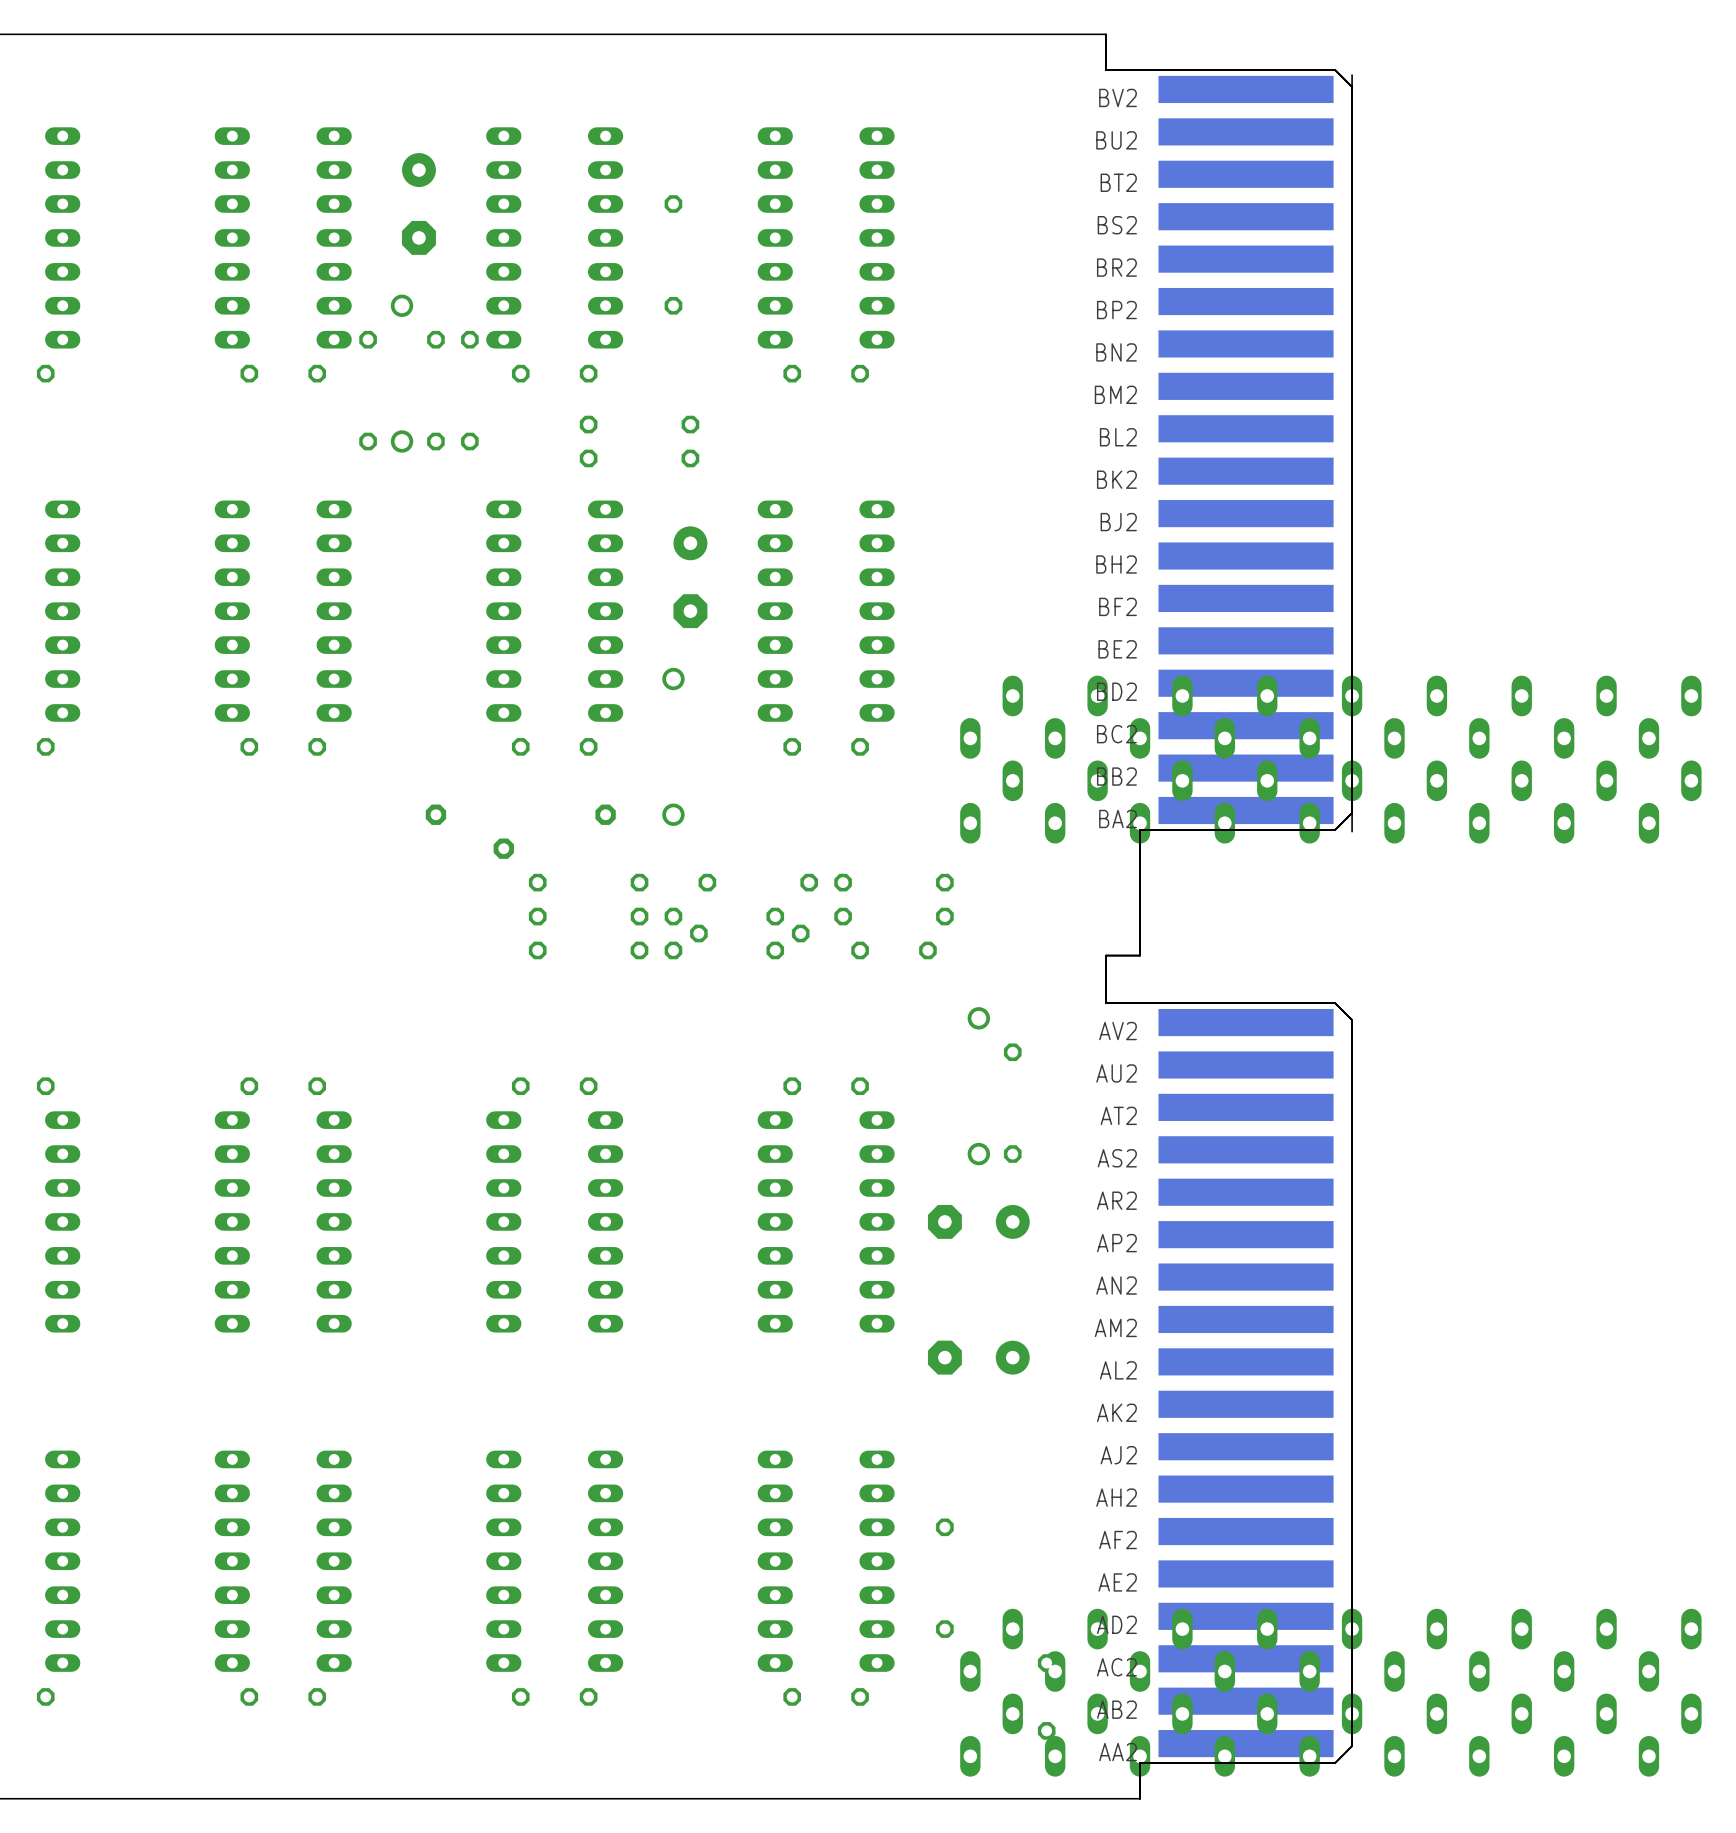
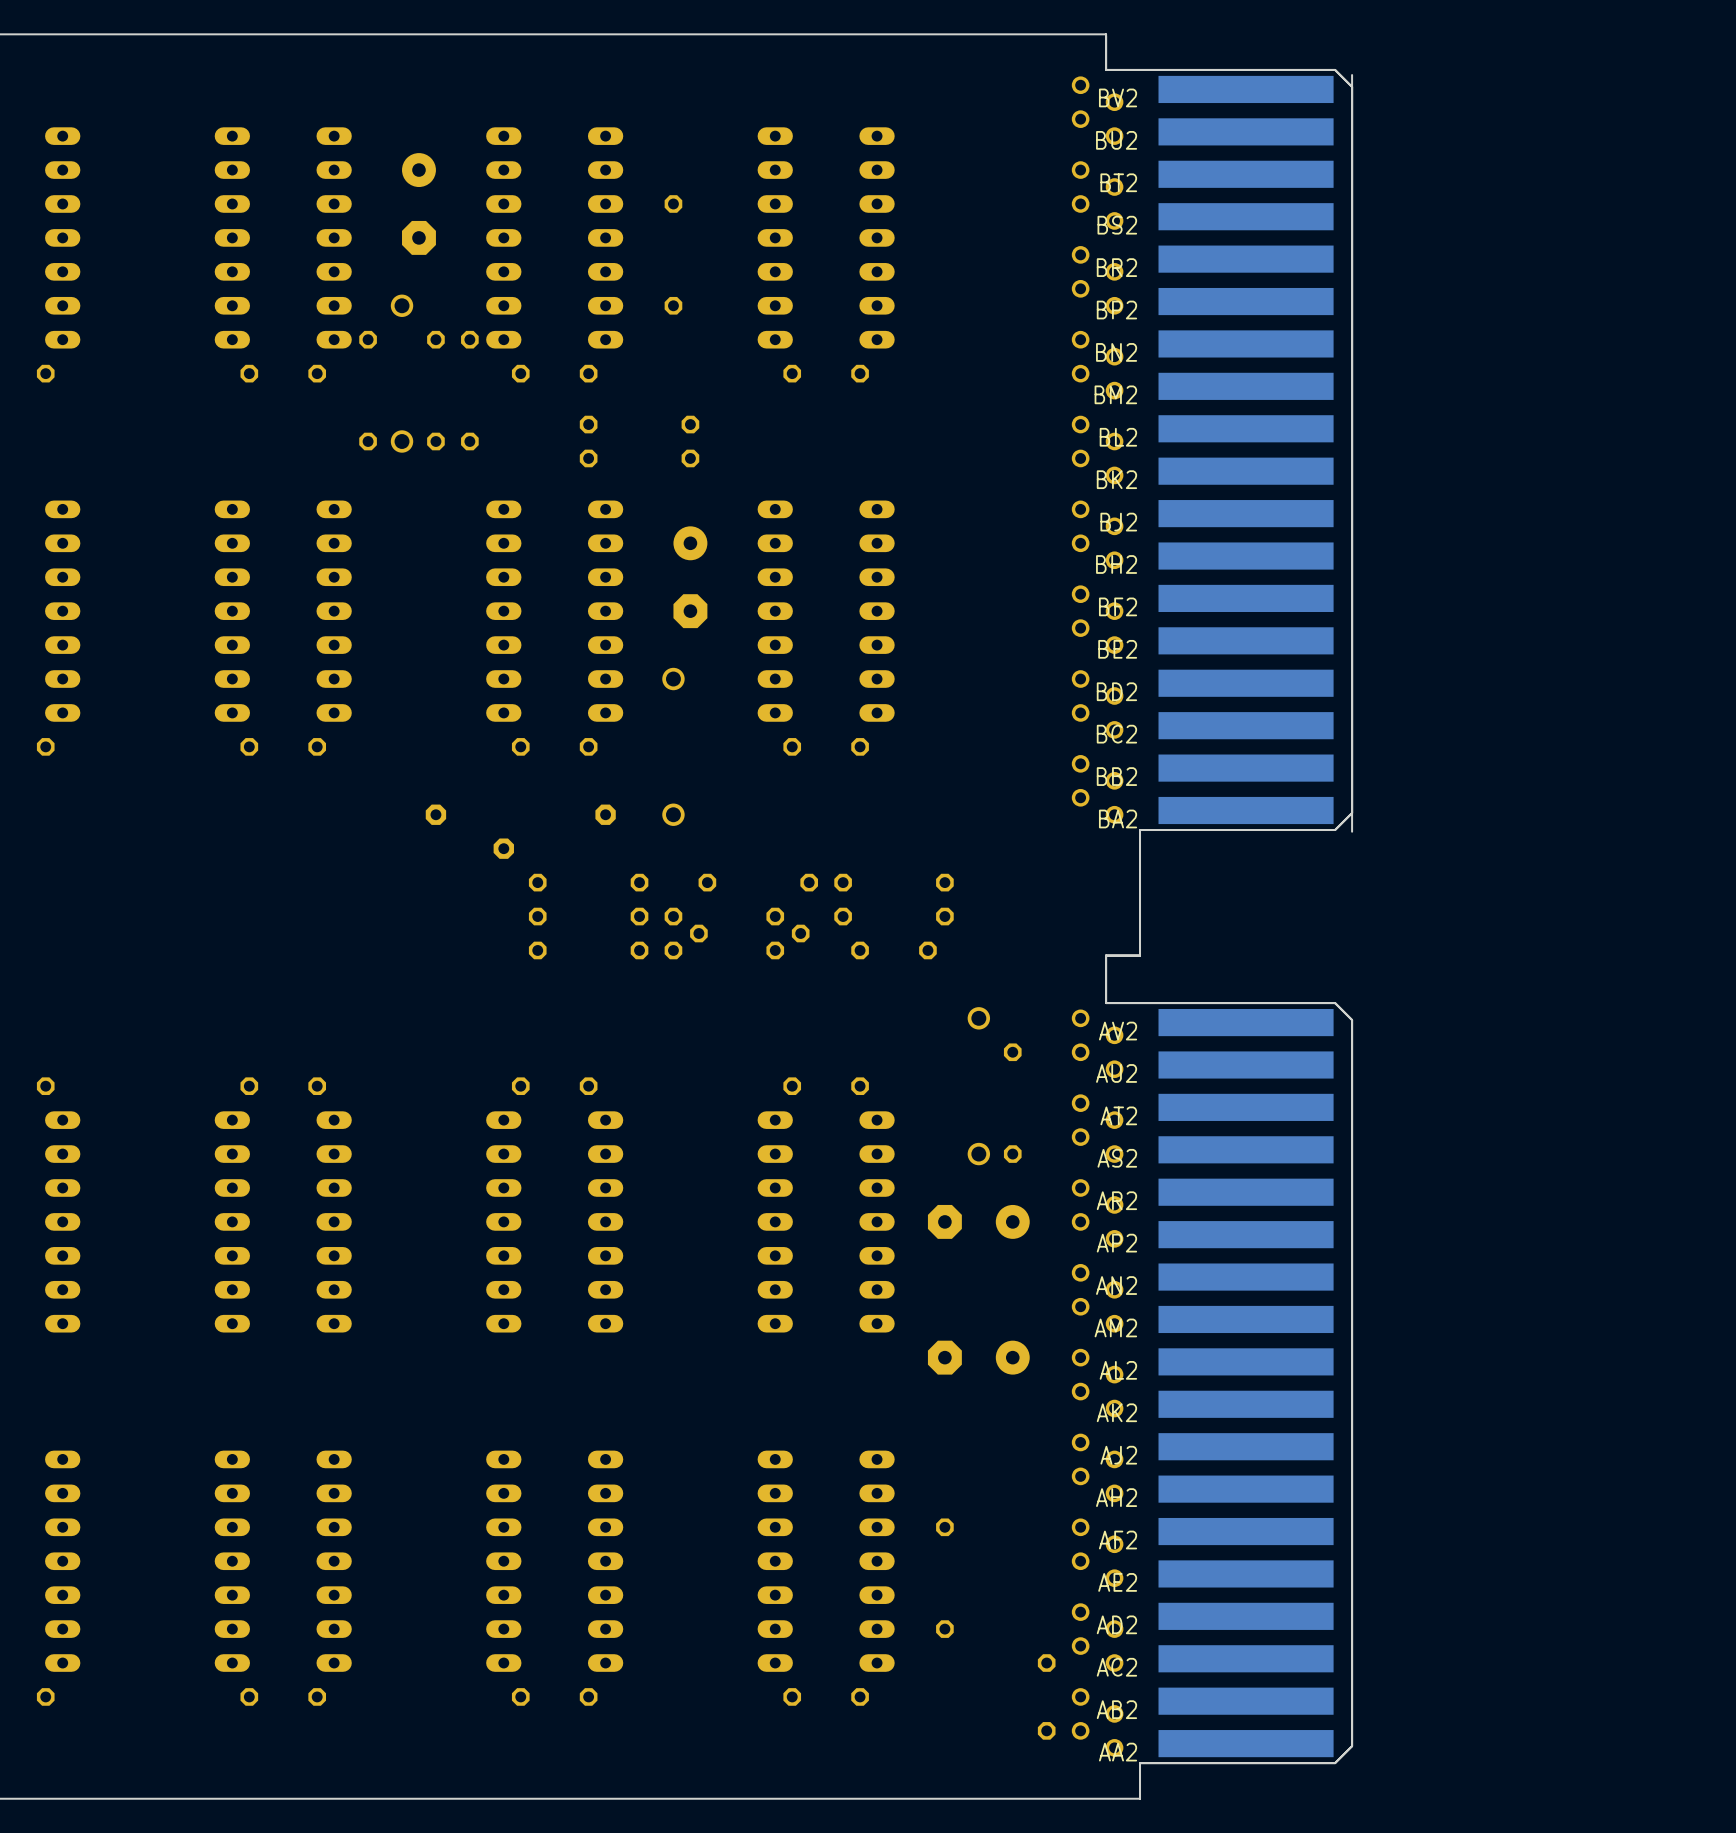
part: none -> (1097, 449)
part: (1330, 759) -> none
part: none -> (1097, 1383)
part: (1330, 1692) -> none

